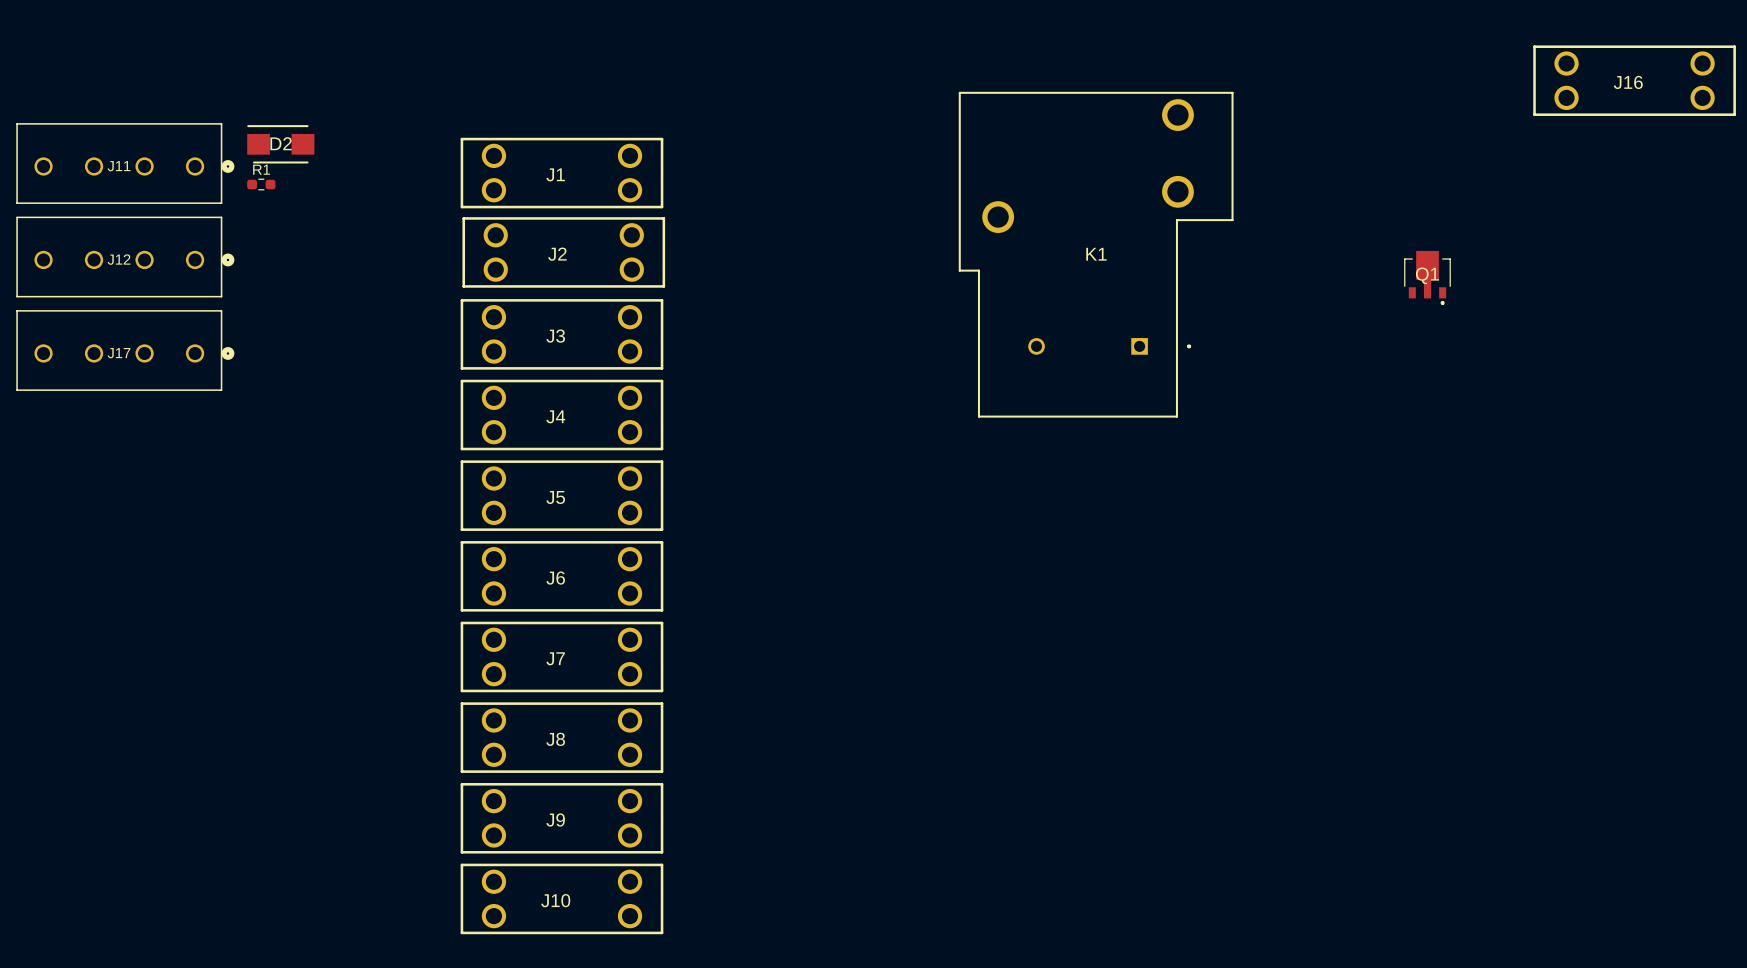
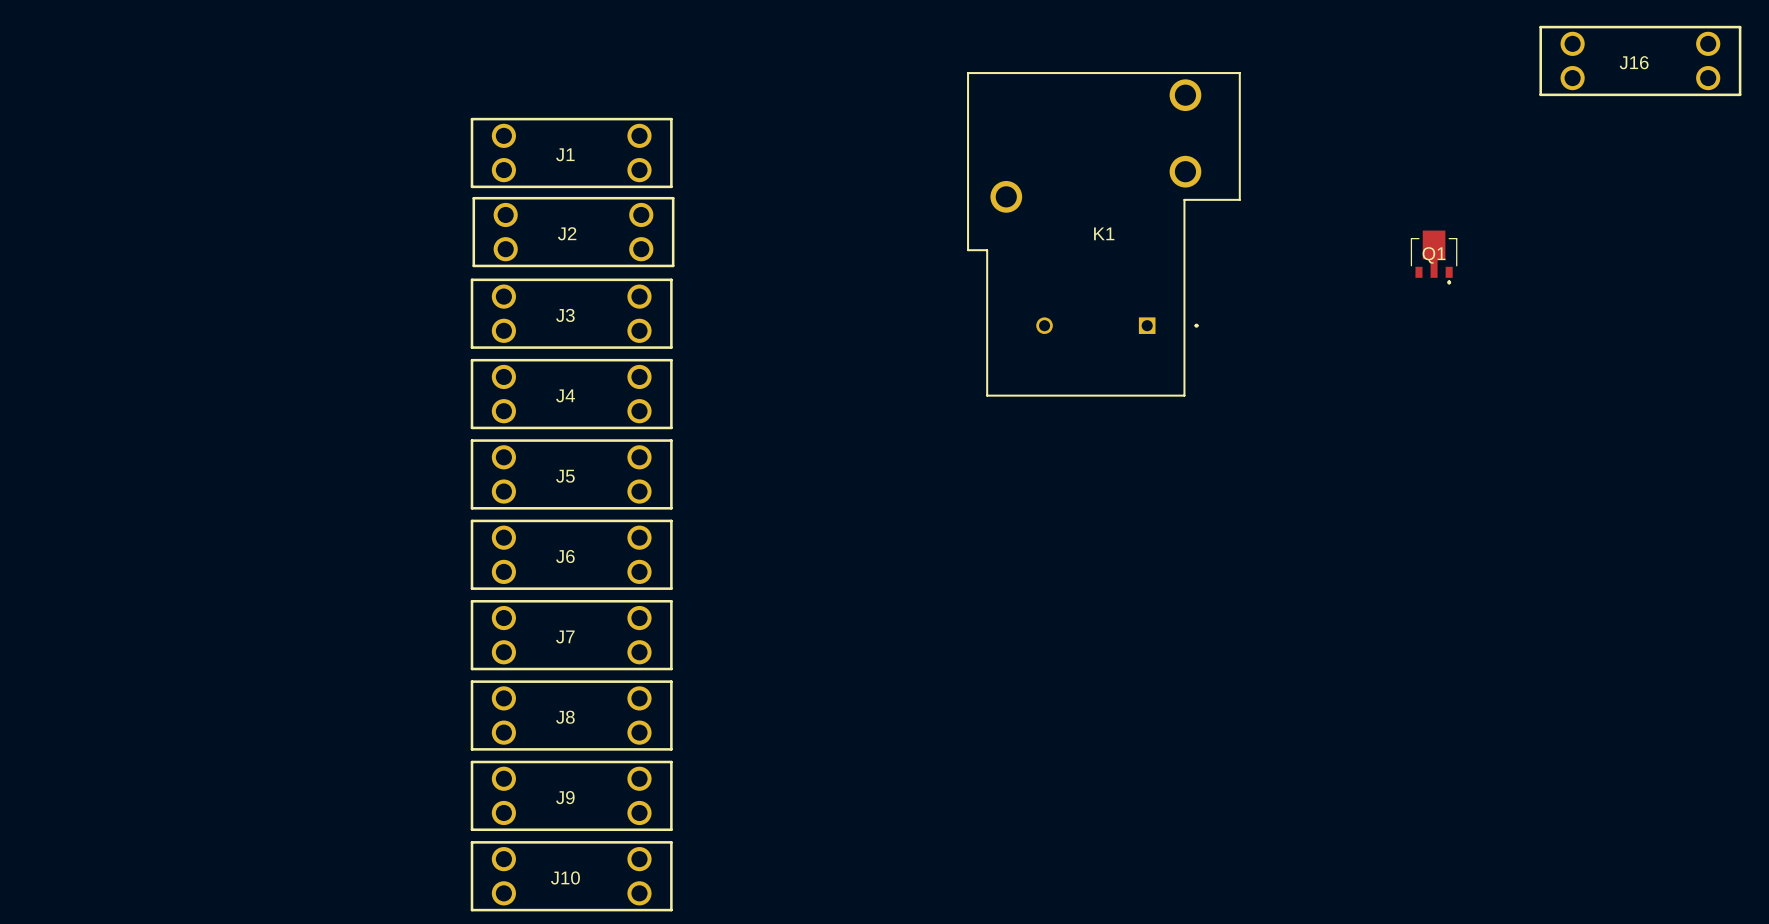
D2: (280, 144) -> none
J11: (125, 163) -> none
R1: (261, 184) -> none
J12: (125, 257) -> none
J17: (125, 350) -> none

